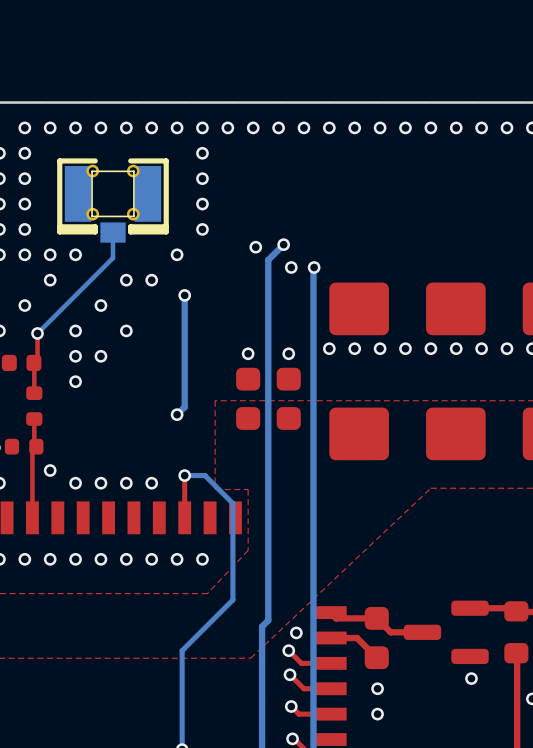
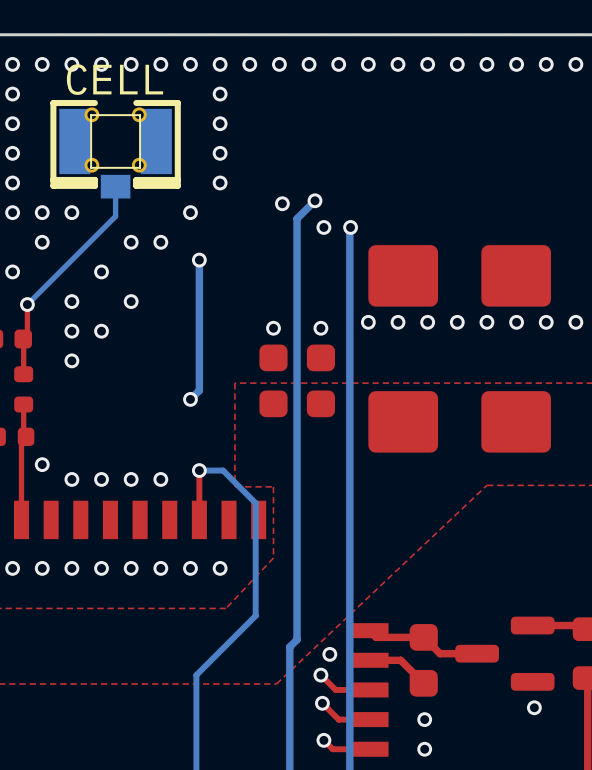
text: none -> CELL (114, 79)

